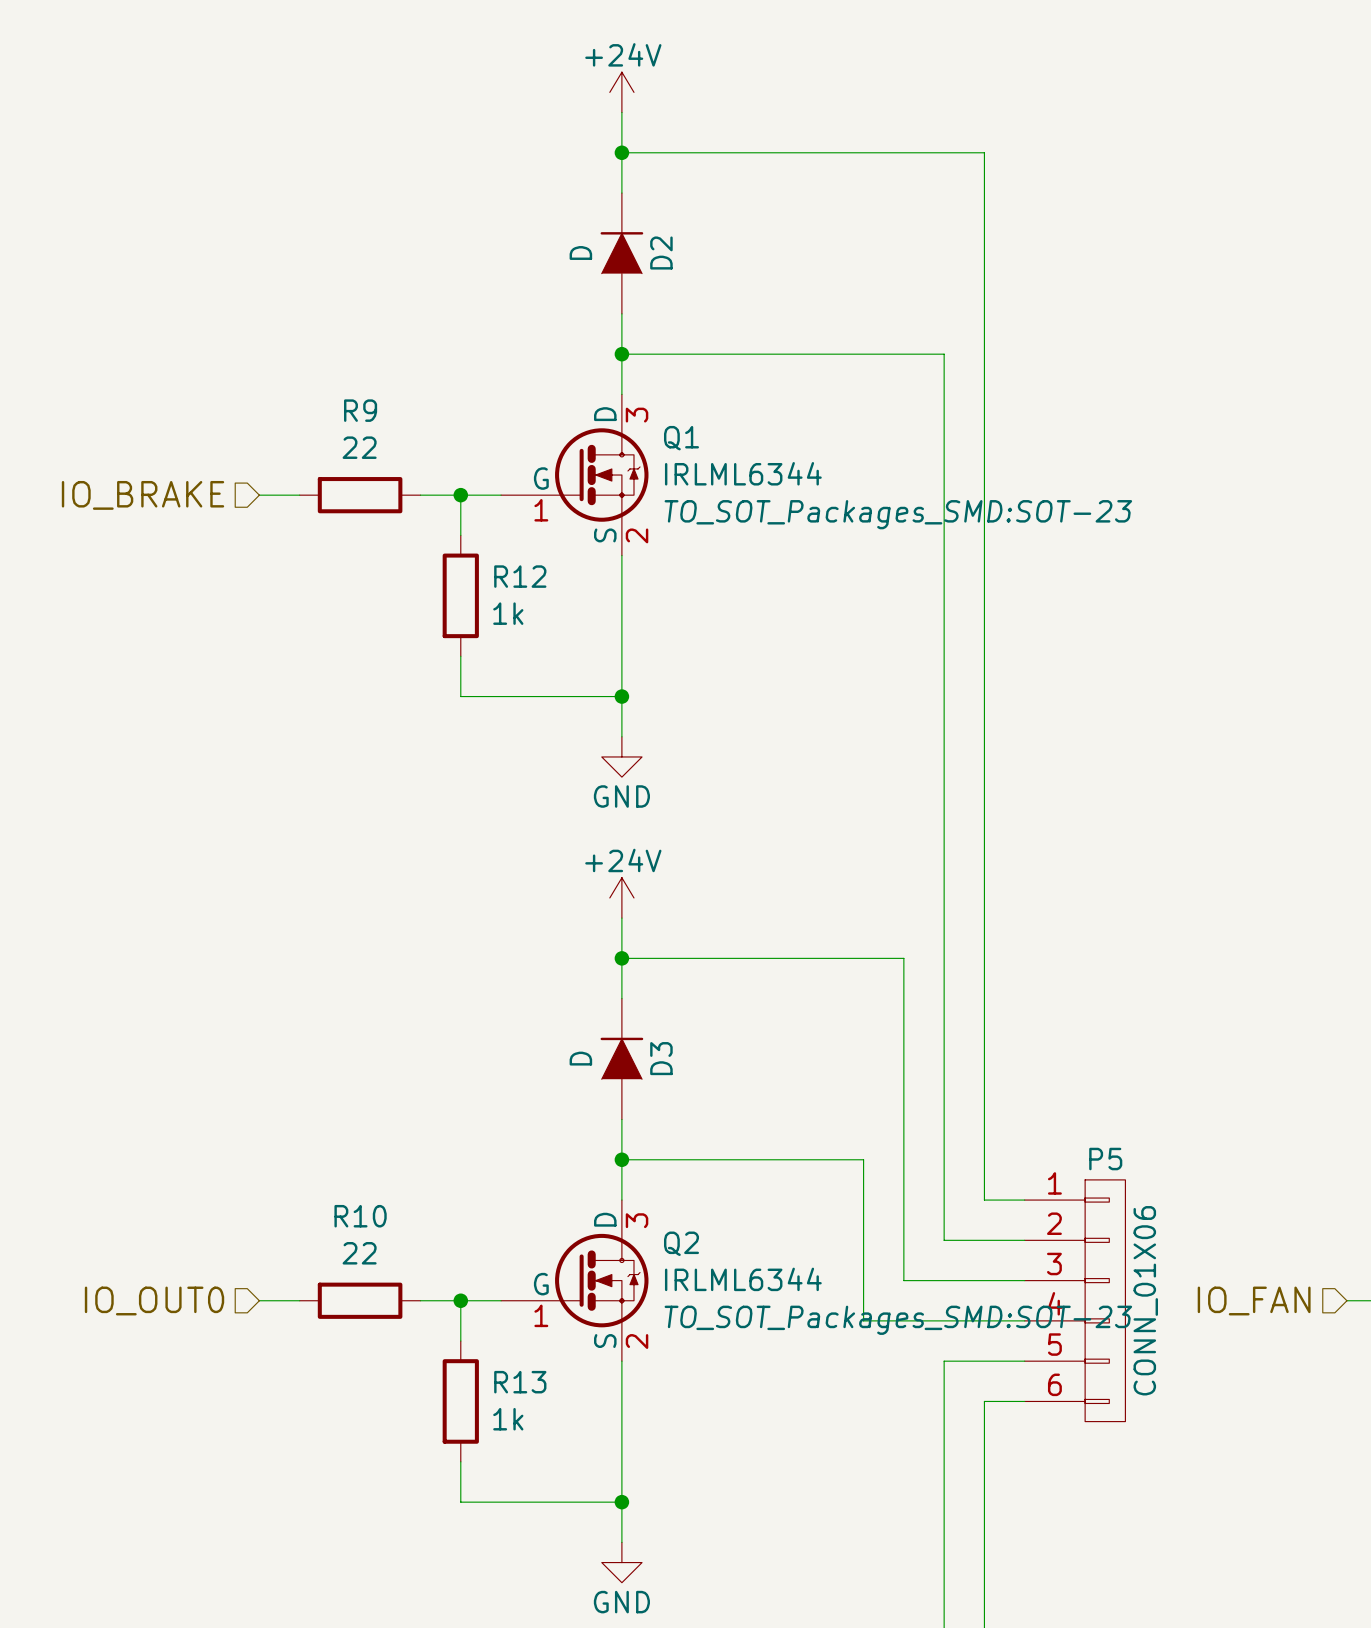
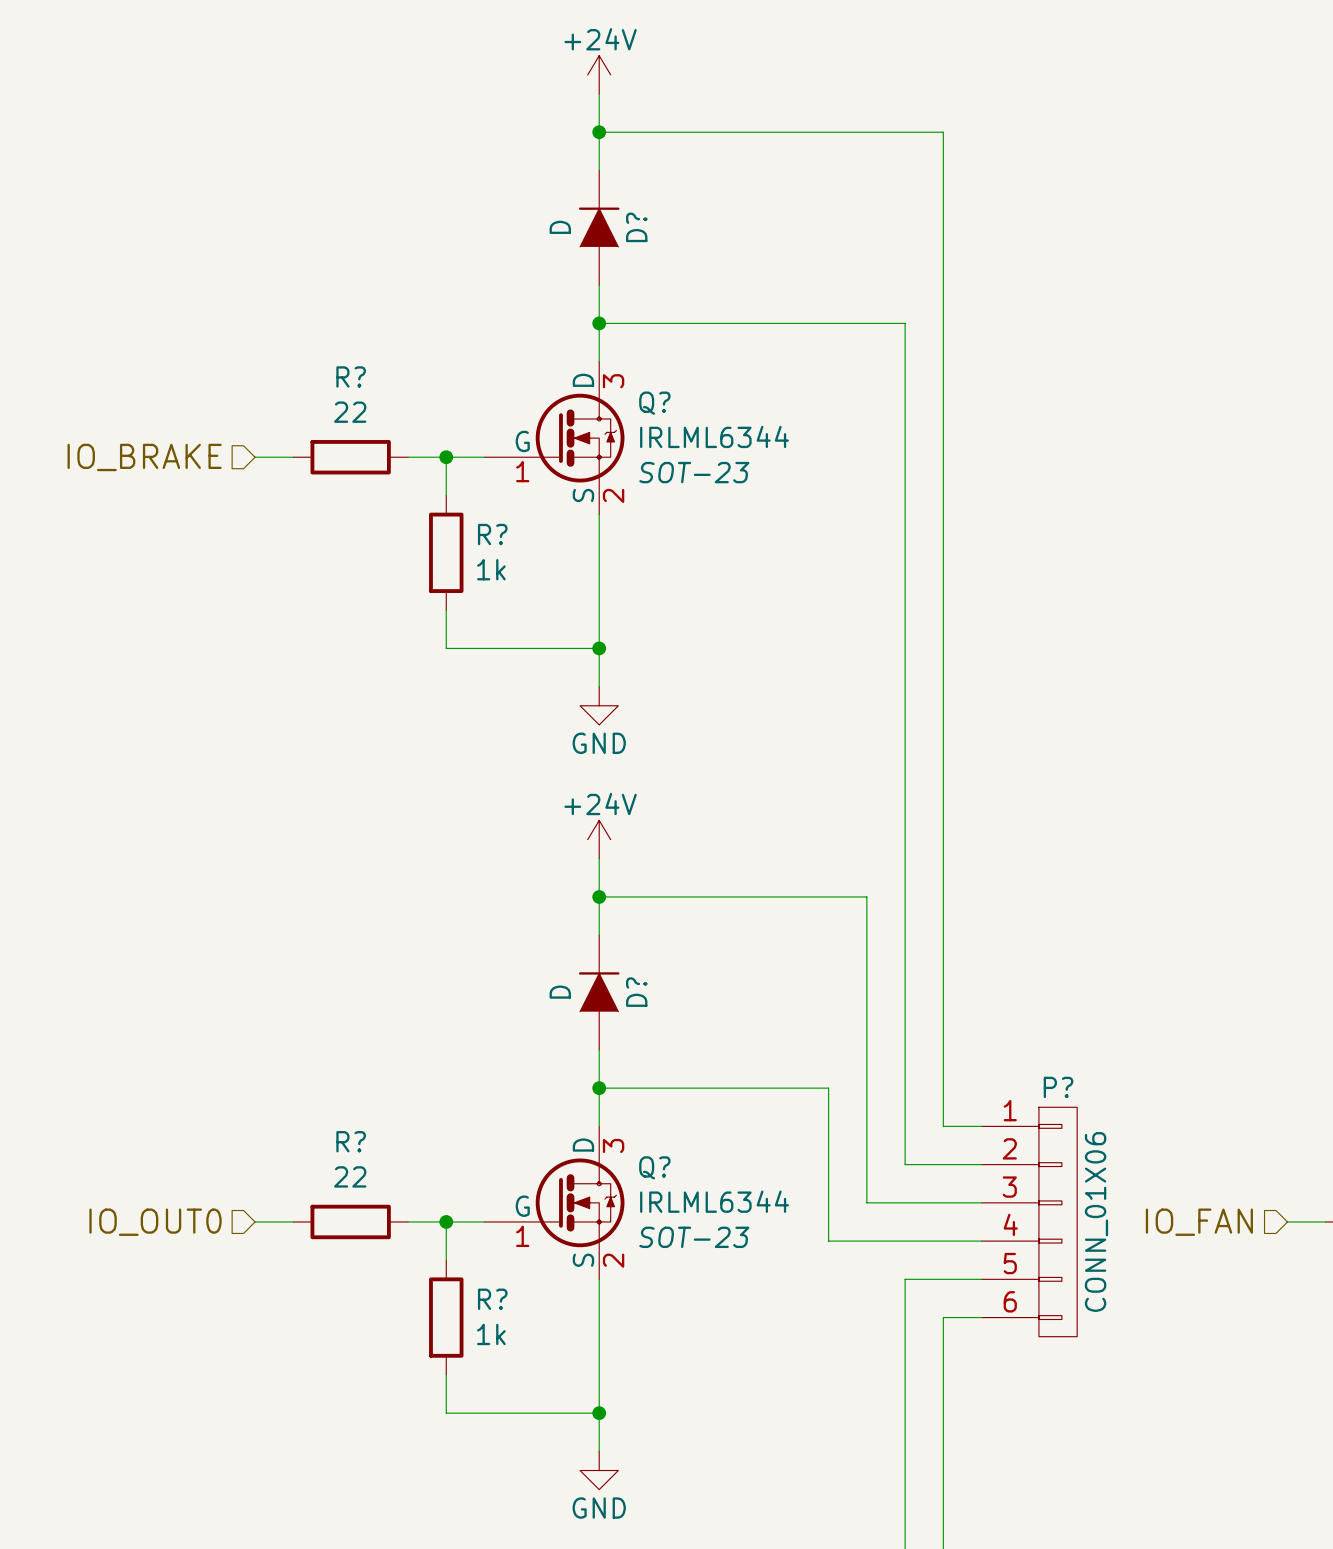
D2 name: D2 (661, 253) -> D? (636, 227)
R9 name: R9 (360, 410) -> R? (351, 376)
Q1 name: Q1 (681, 438) -> Q? (654, 403)
Q1 text: TO_SOT_Packages_SMD:SOT-23 (898, 514) -> SOT-23 (694, 472)
R12 name: R12 (520, 576) -> R? (492, 534)
D3 name: D3 (661, 1058) -> D? (636, 992)
P5 name: P5 (1105, 1159) -> P? (1058, 1087)
R10 name: R10 (360, 1216) -> R? (351, 1141)
Q2 name: Q2 (681, 1243) -> Q? (654, 1167)
Q2 text: TO_SOT_Packages_SMD:SOT-23 (898, 1320) -> SOT-23 (694, 1237)
R13 name: R13 (520, 1382) -> R? (492, 1299)

